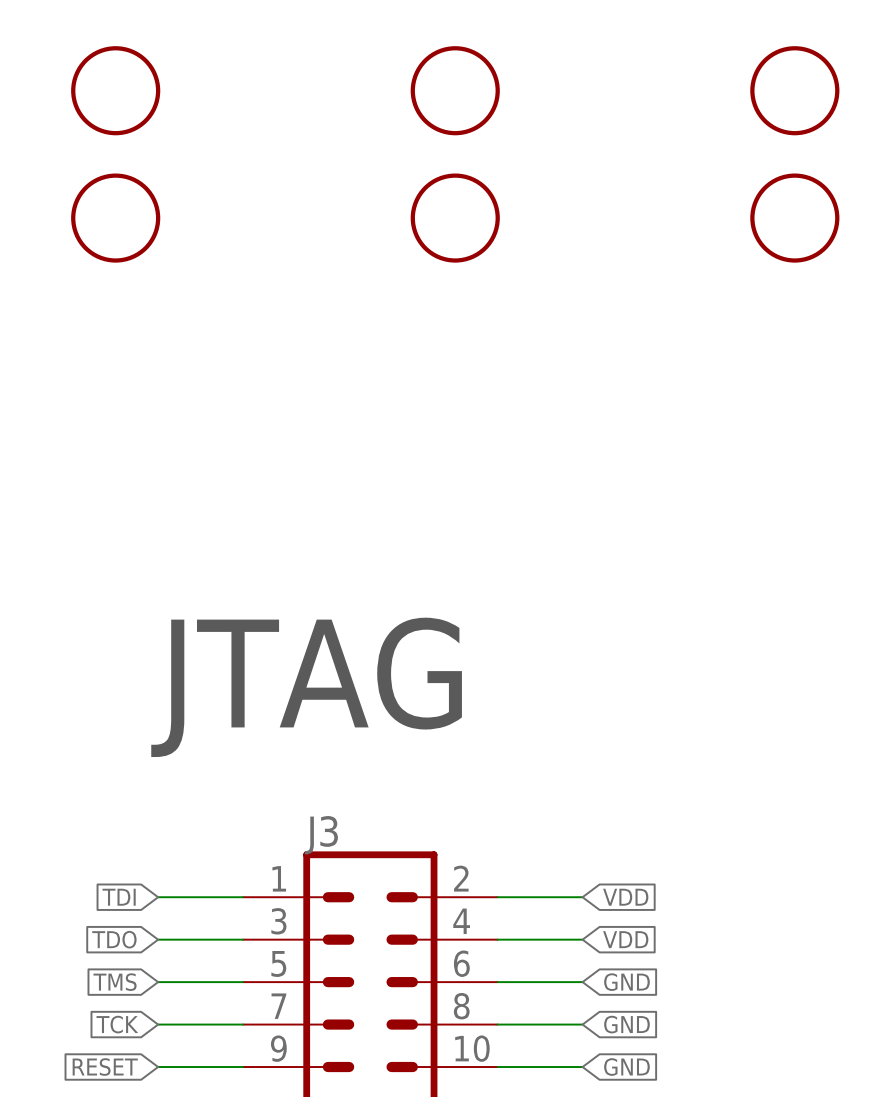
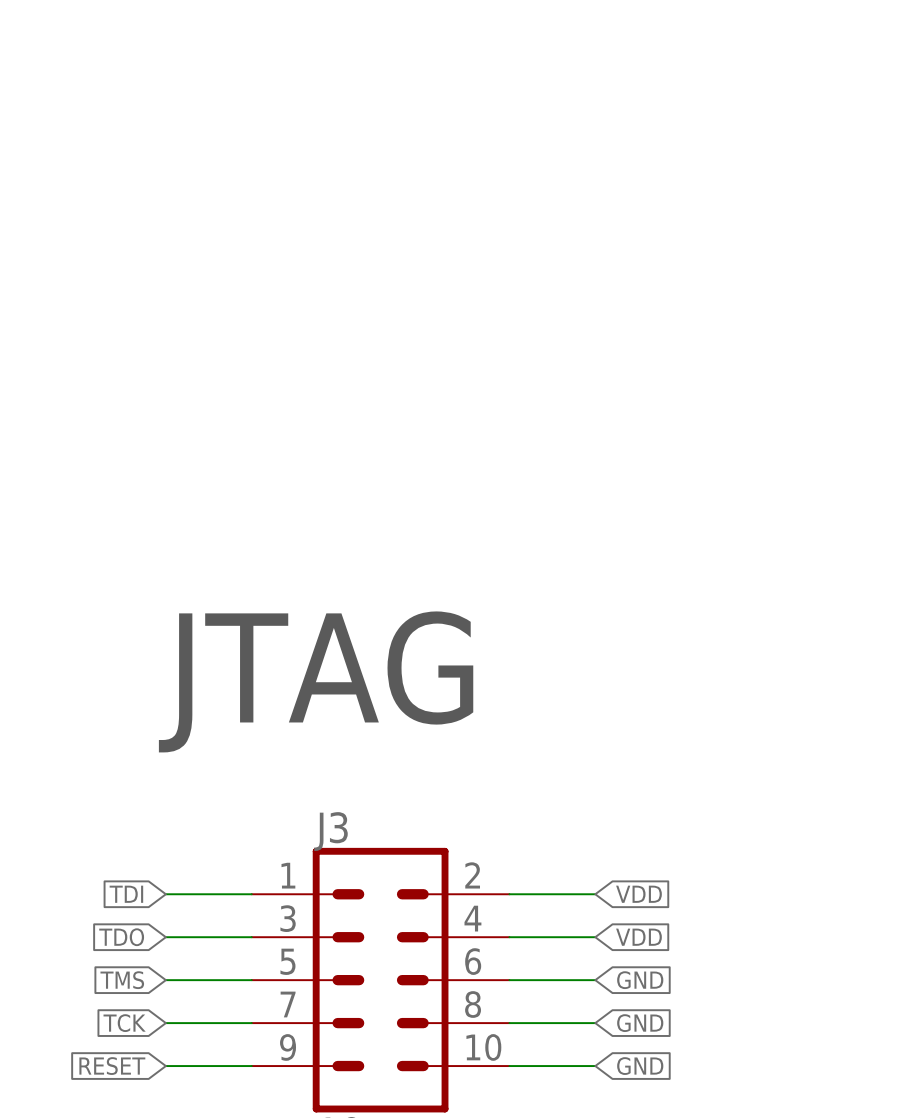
part: (115, 90) -> none
part: (455, 90) -> none
part: (794, 90) -> none
part: (115, 218) -> none
part: (455, 218) -> none
part: (794, 218) -> none

